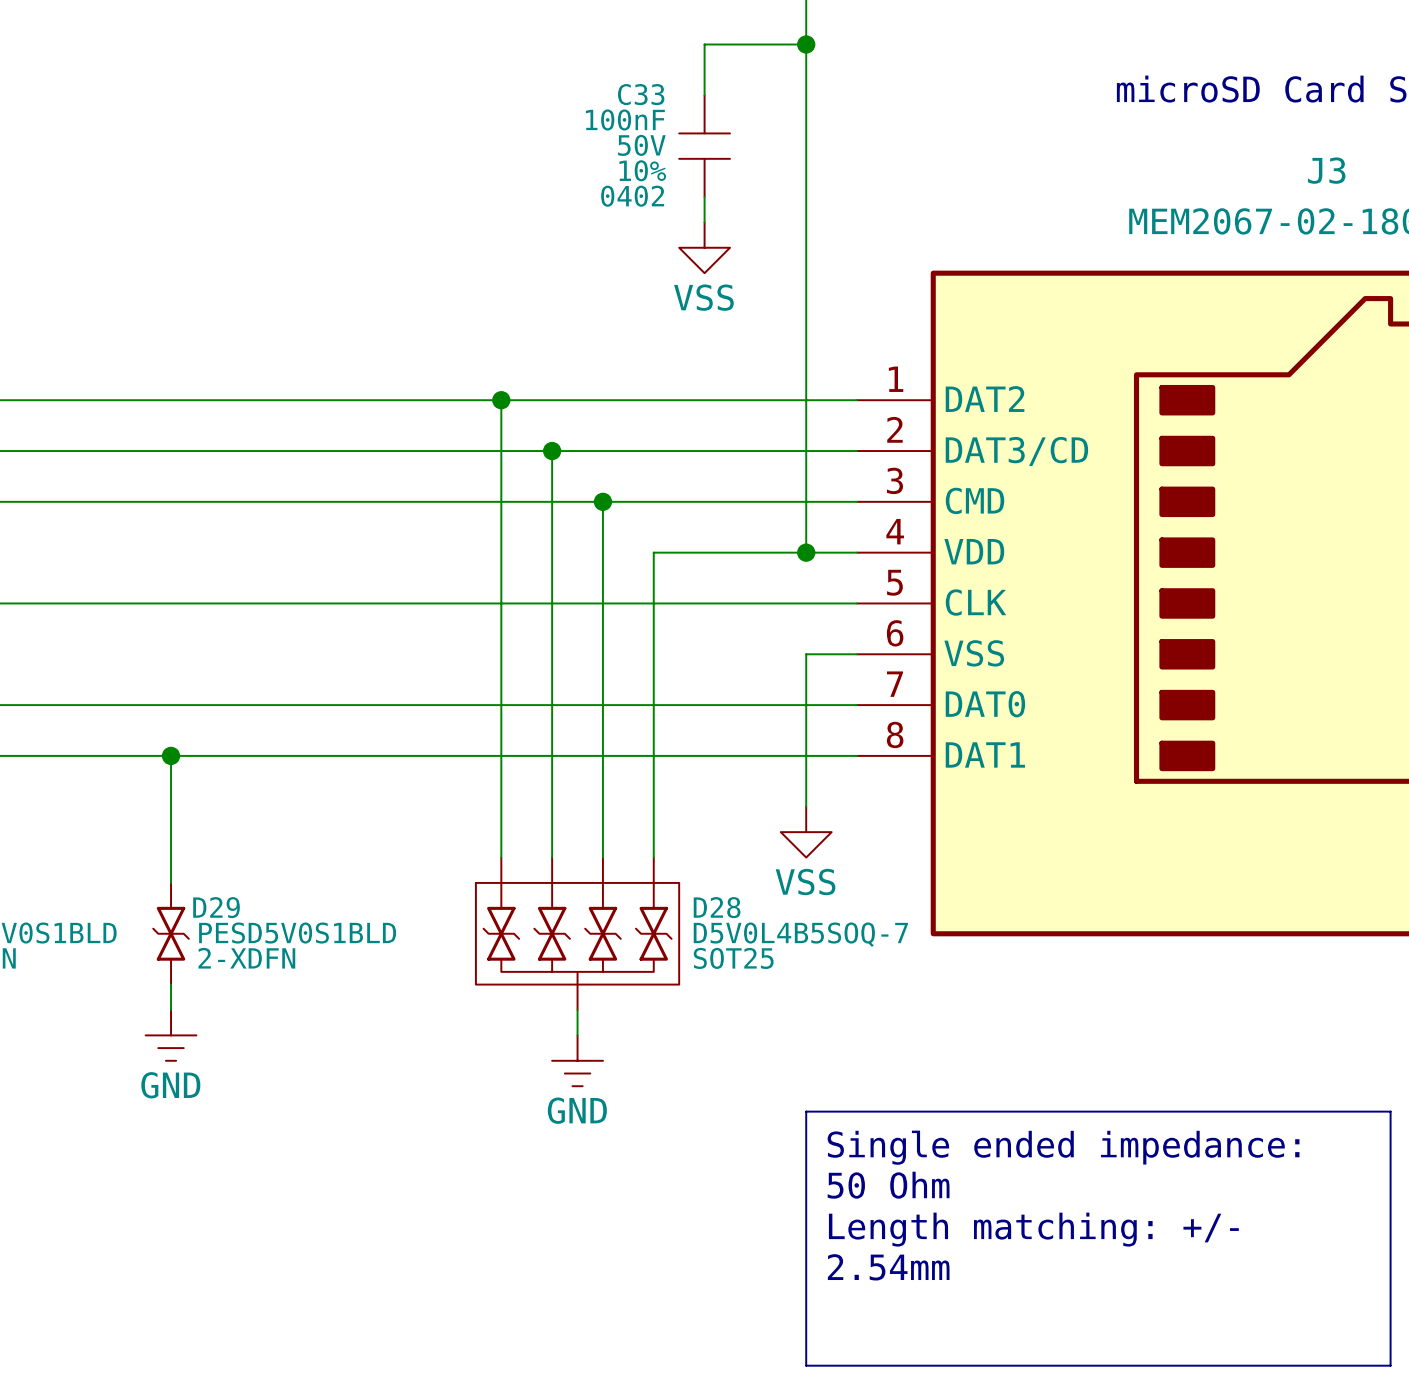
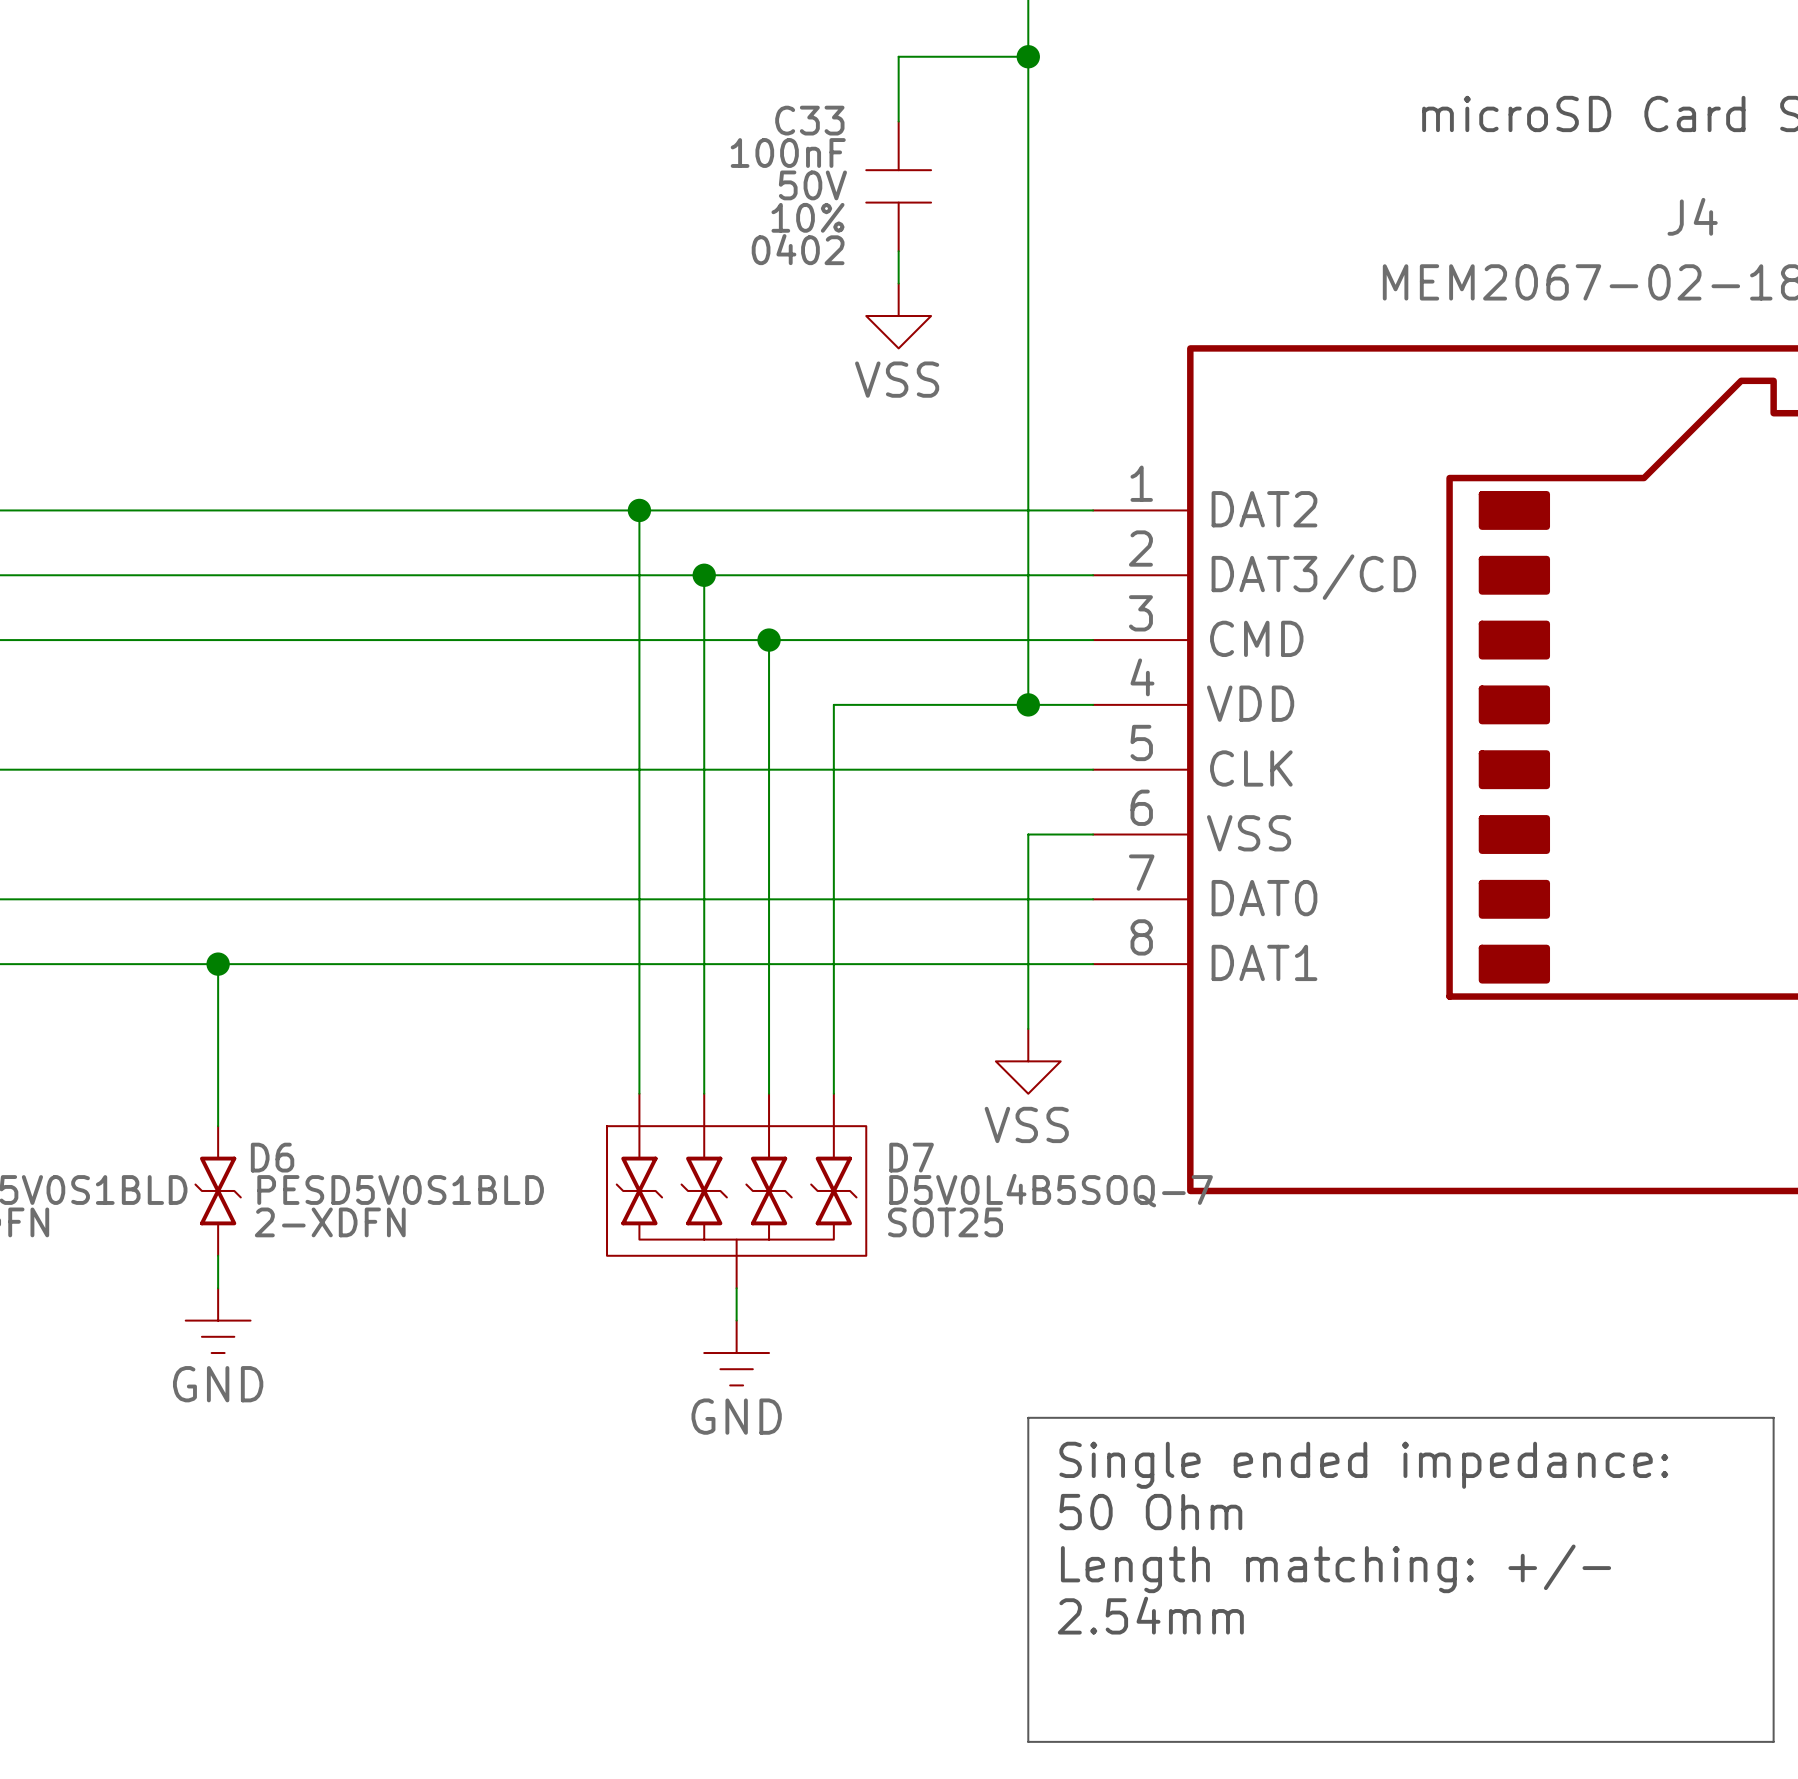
J3 name: J3 (1326, 170) -> J4 (1692, 216)
D29 name: D29 (216, 907) -> D6 (272, 1157)
D28 name: D28 (717, 907) -> D7 (911, 1157)

